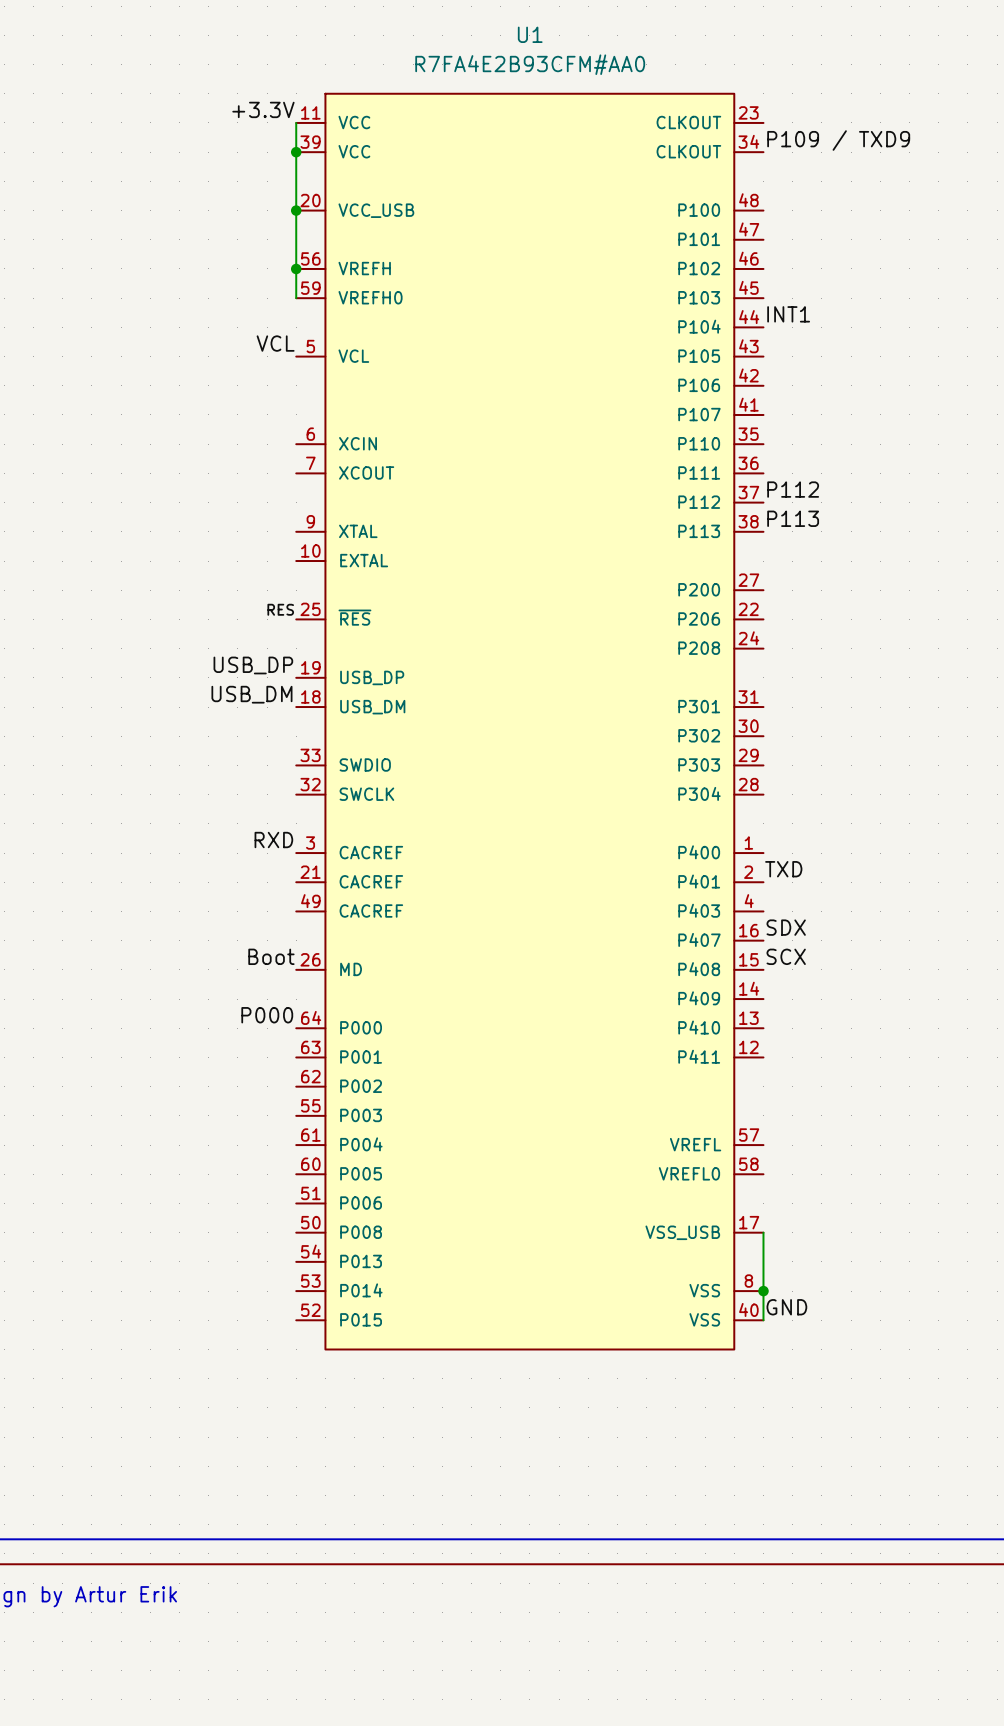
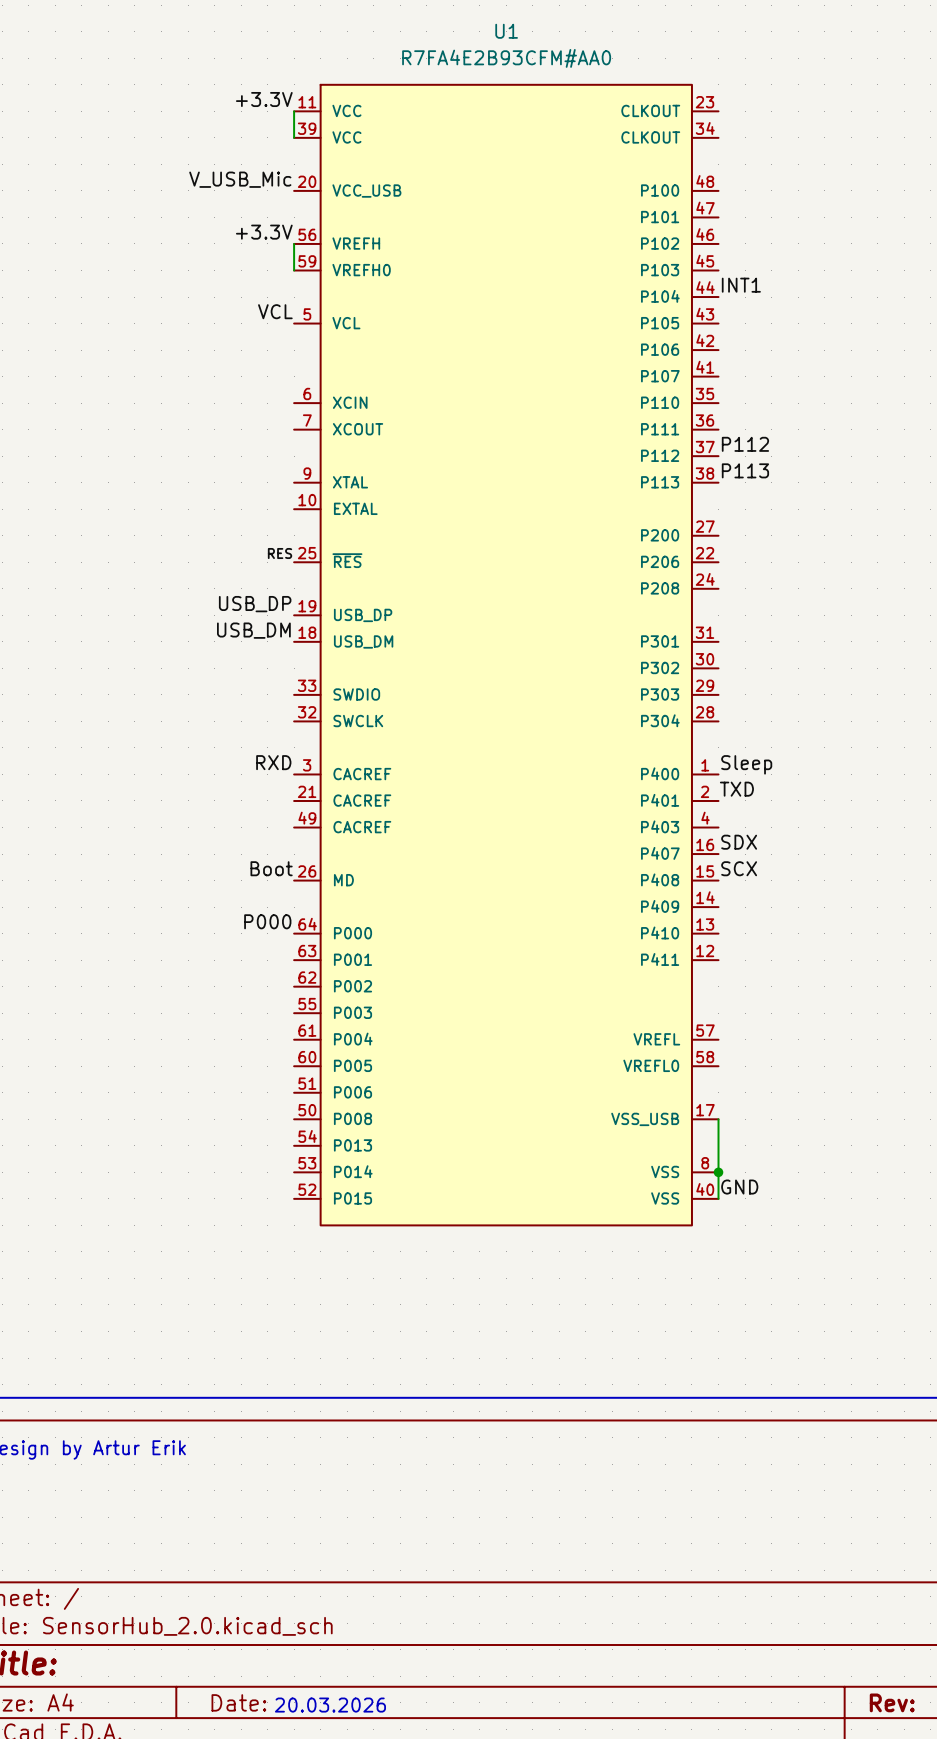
label: P109 / TXD9 (838, 140) -> none
wire: (296, 152) (296, 268) -> none
junction: (296, 152) -> none
label: none -> V_USB_Mic (240, 179)
junction: (296, 210) -> none
label: none -> +3.3V (264, 232)
junction: (296, 268) -> none
label: none -> Sleep (746, 764)

